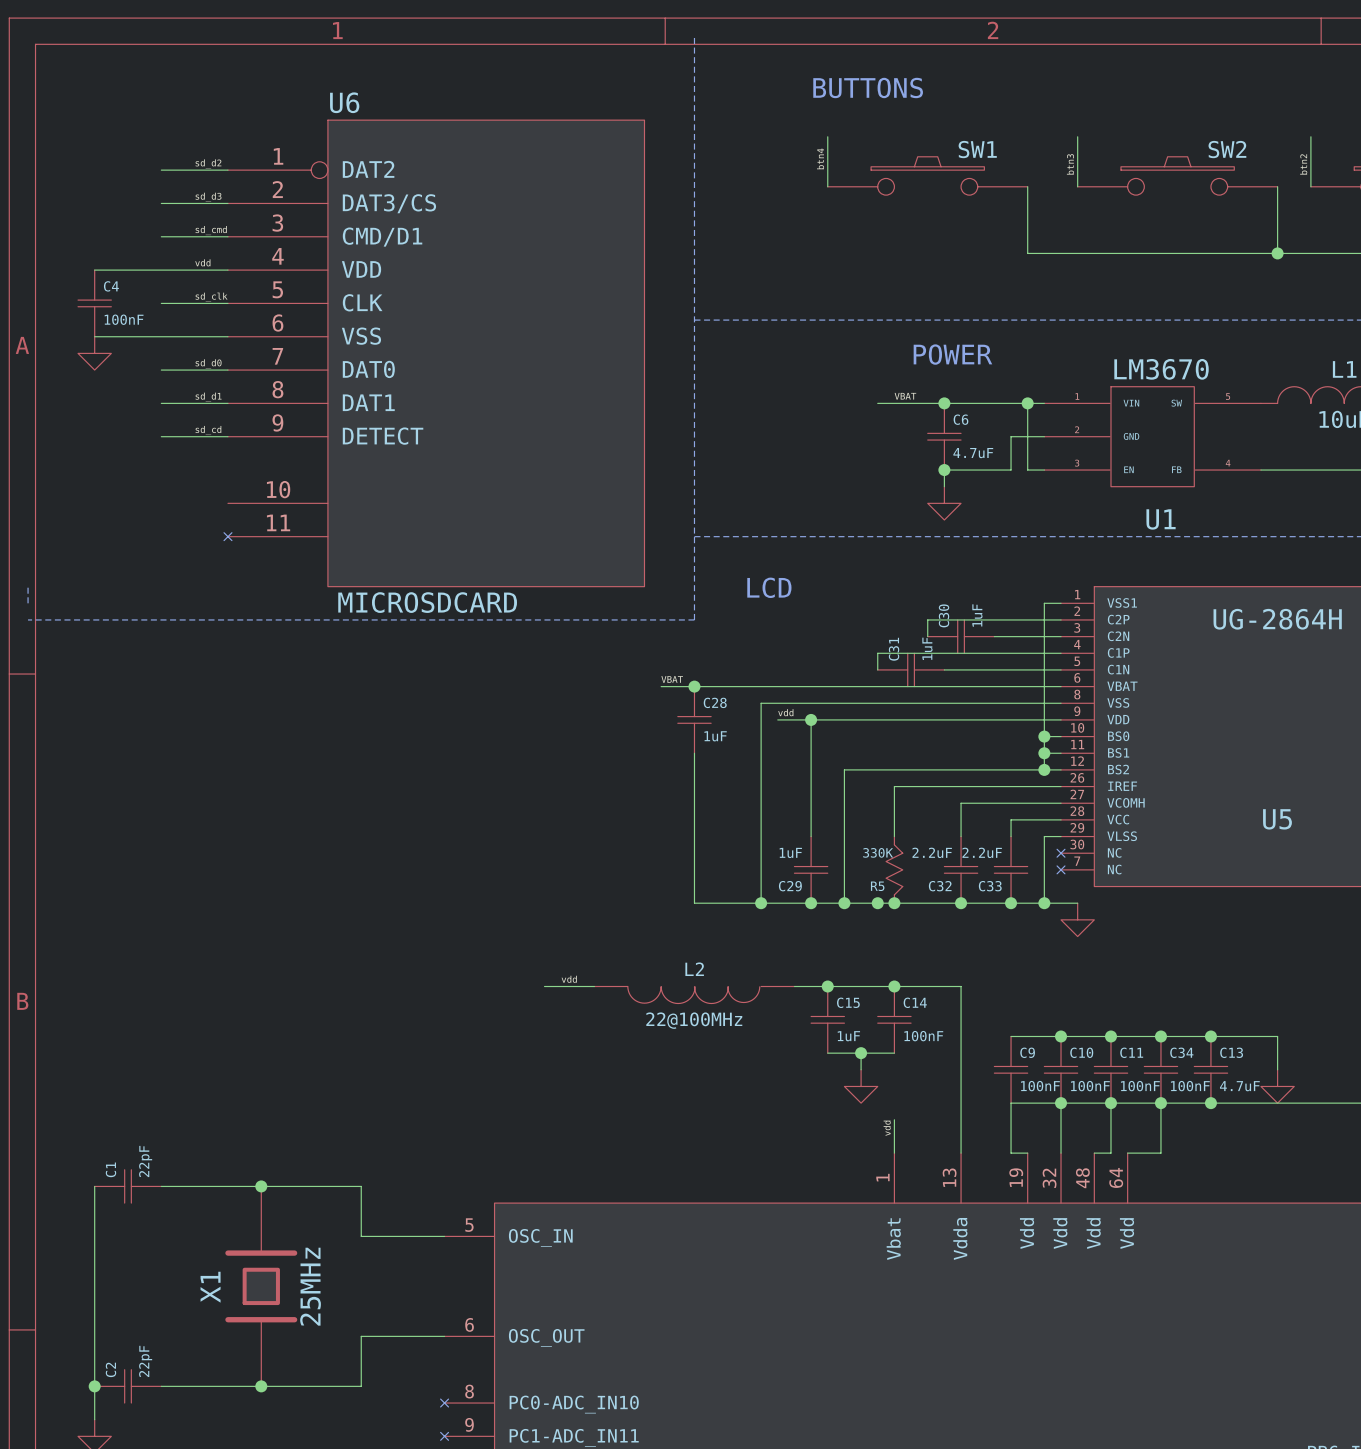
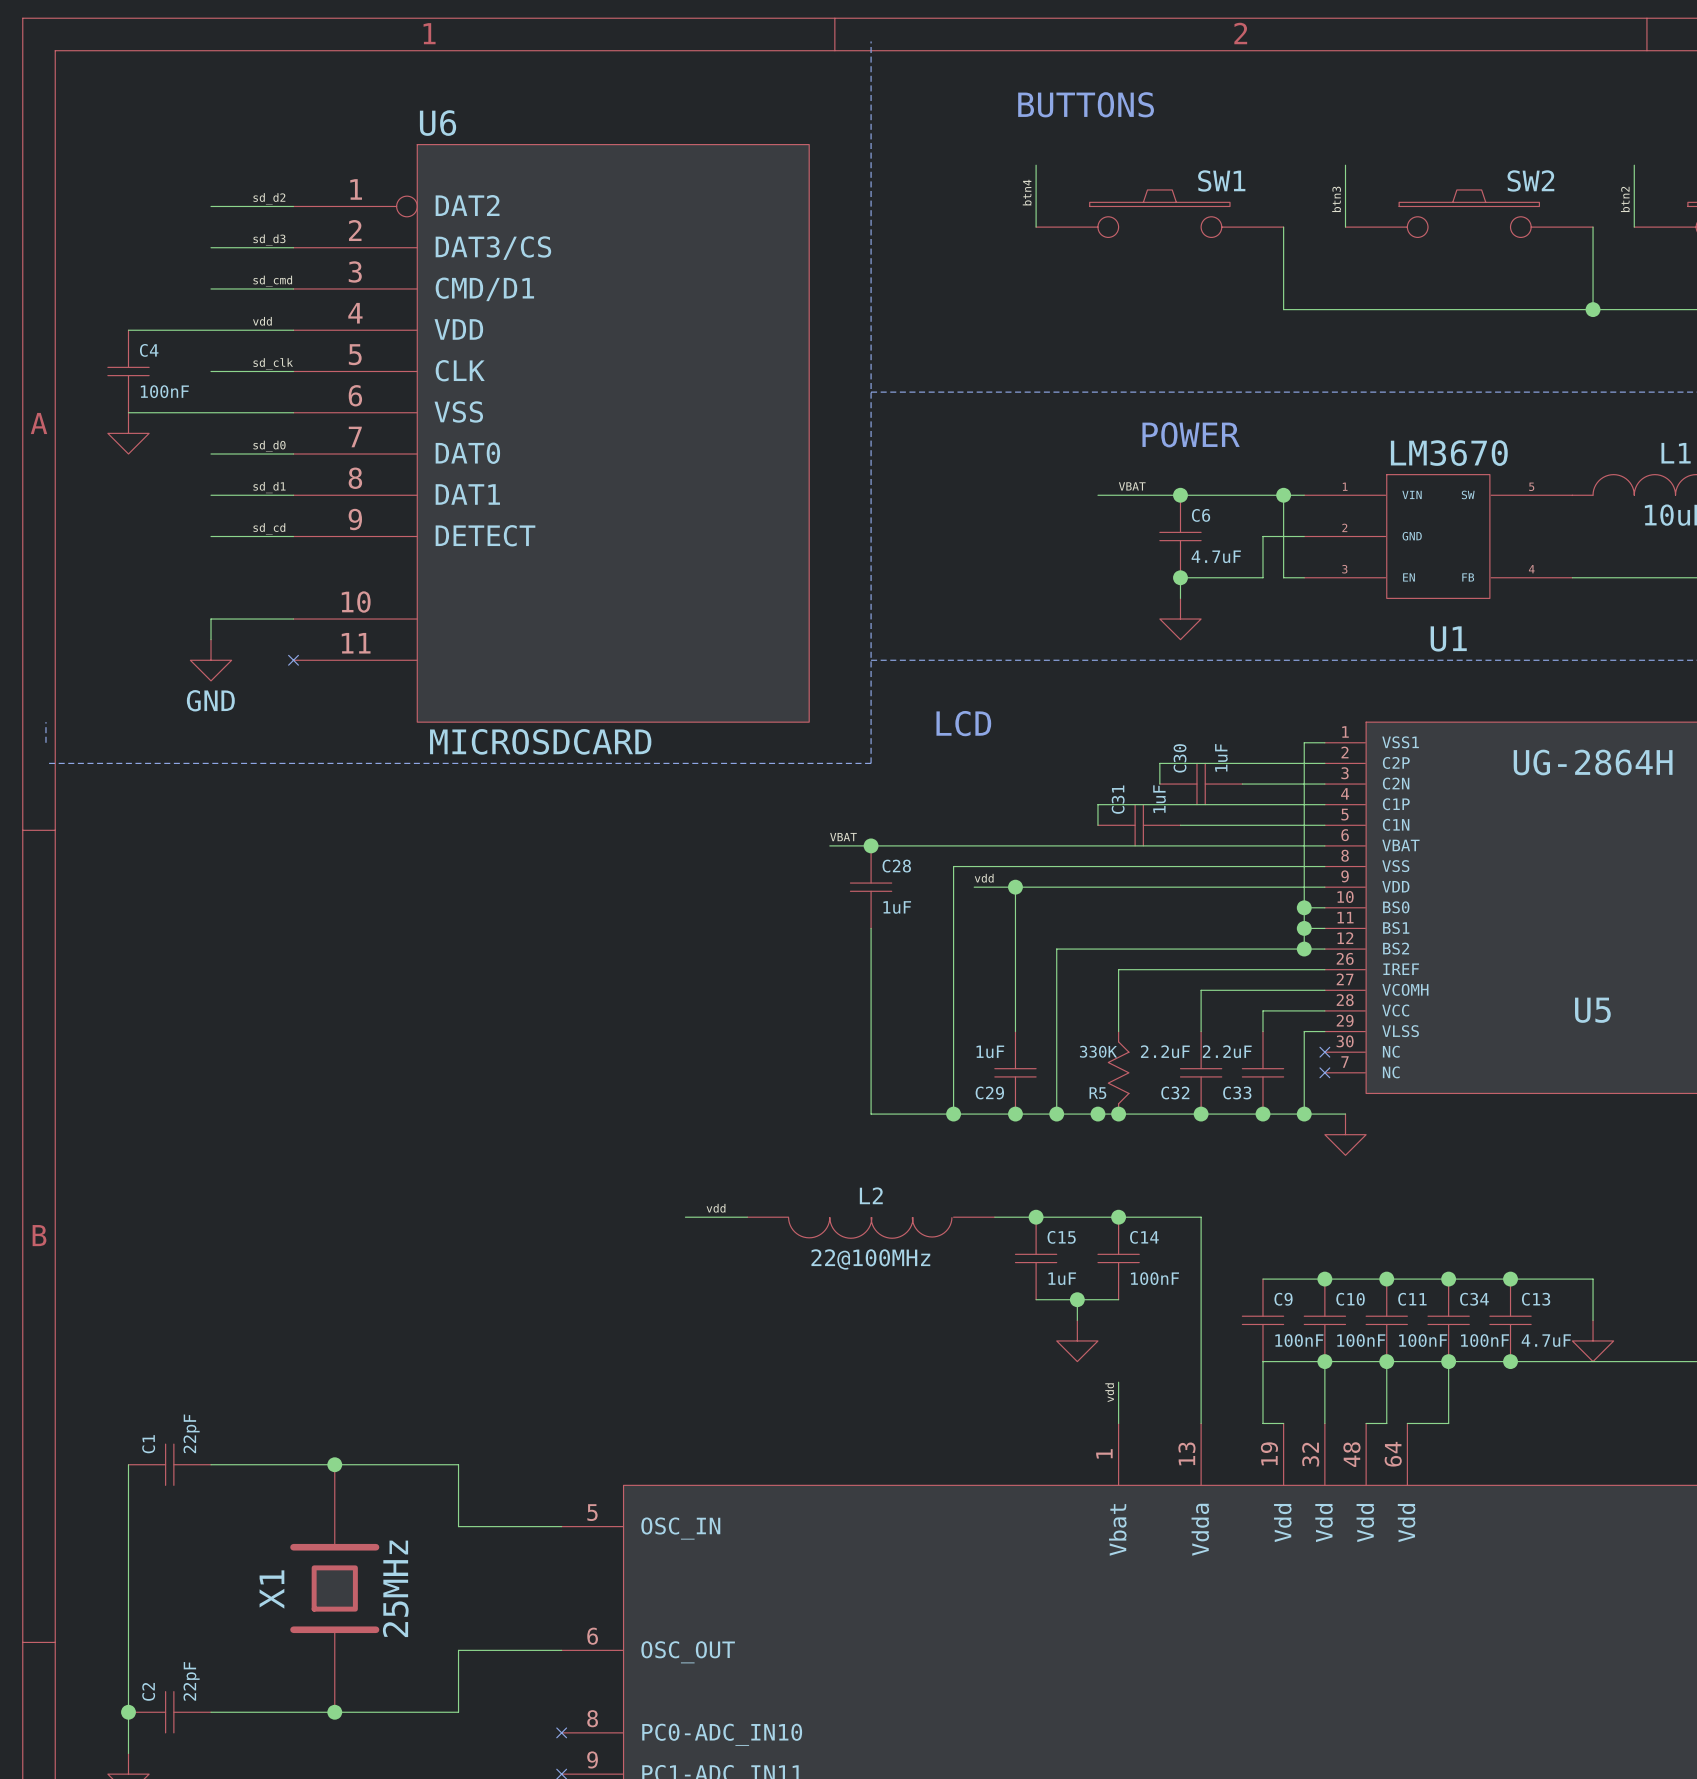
wire: none -> (293, 619) (211, 619) (211, 639)
power symbol: none -> GND (211, 660)

